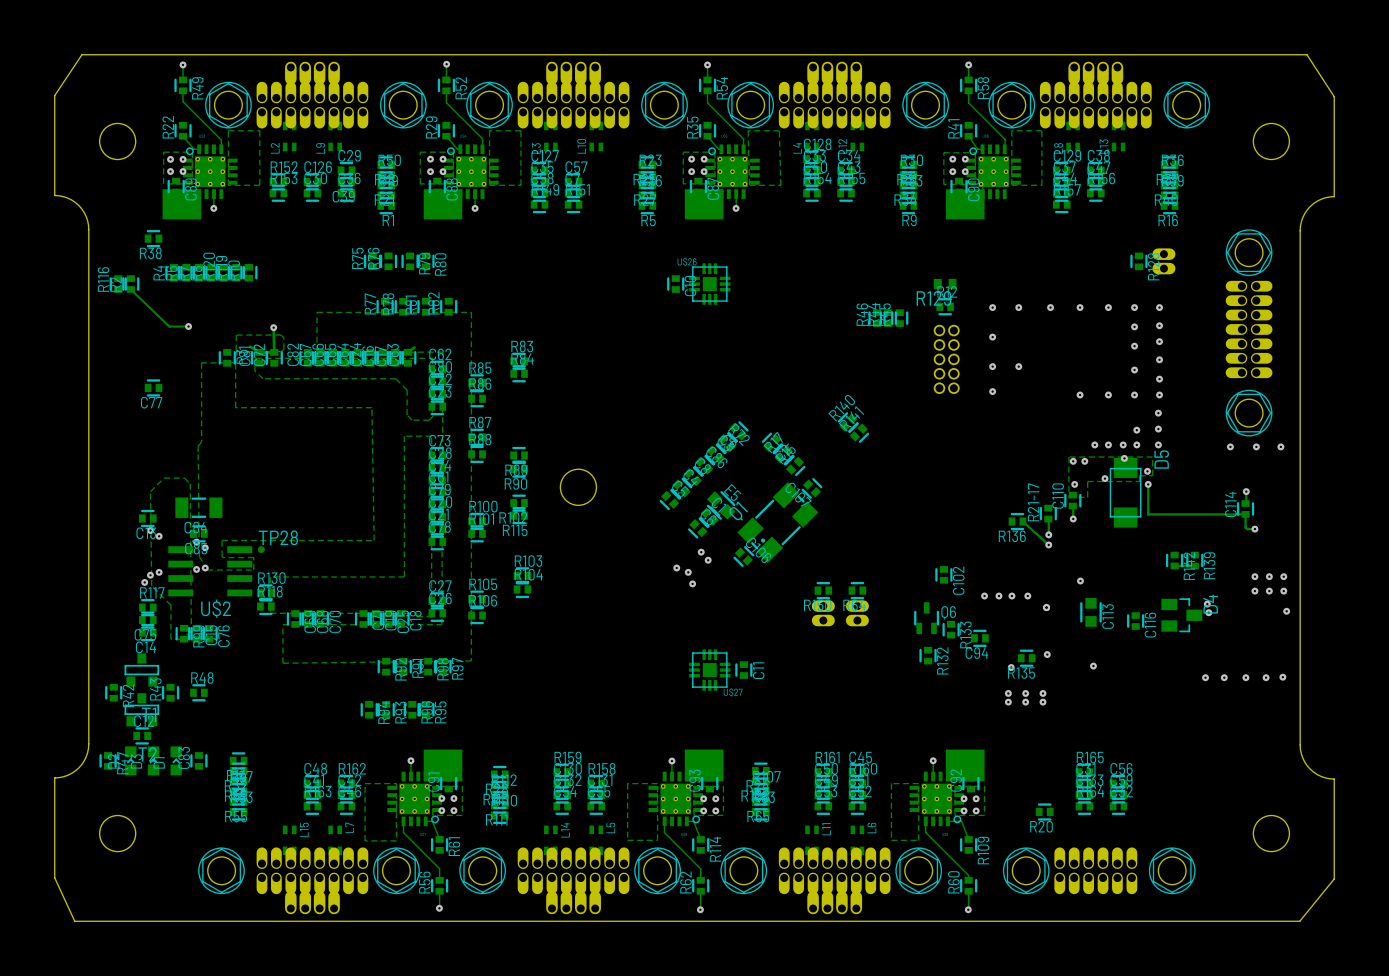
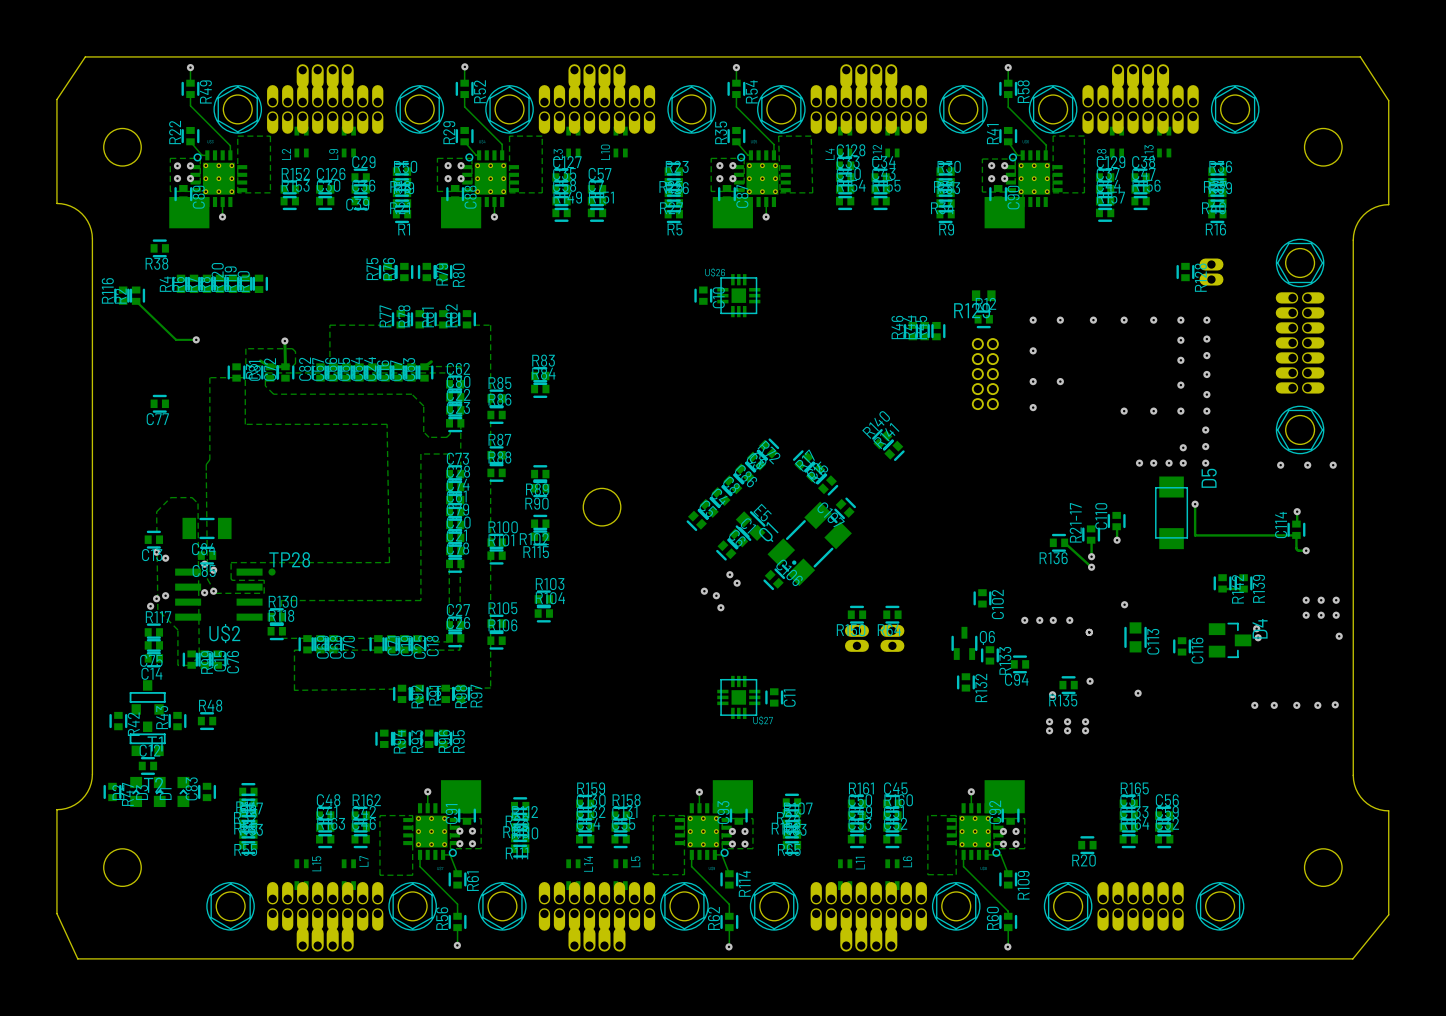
zone outline: (1152, 457) (1068, 457) (1068, 497) (1087, 497) (1087, 481) (1139, 481) (1139, 475) (1152, 475) (1152, 457) -> none
via: (1124, 458) -> none
via: (1073, 461) -> none
via: (1084, 461) -> none
via: (1147, 471) -> none
via: (1104, 478) -> none
via: (1074, 484) -> none

